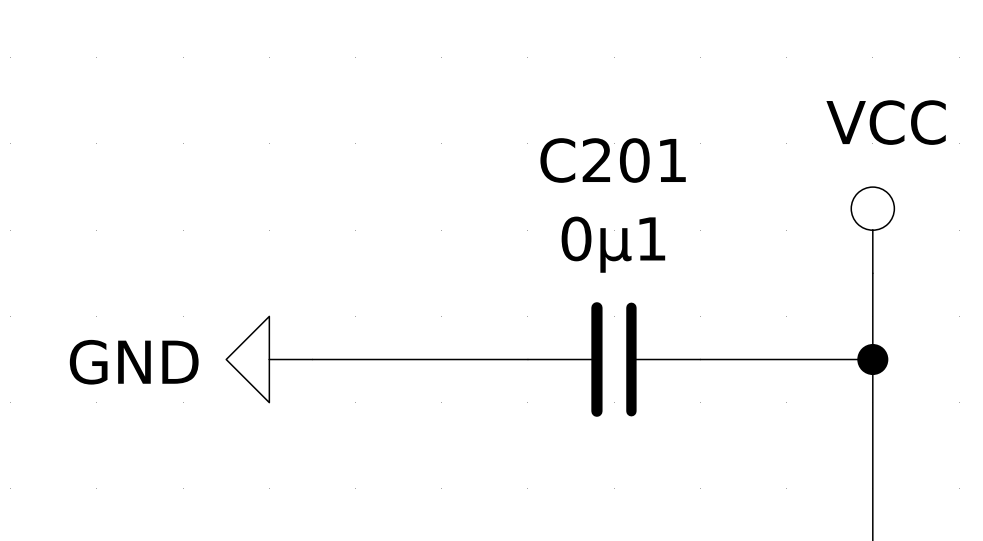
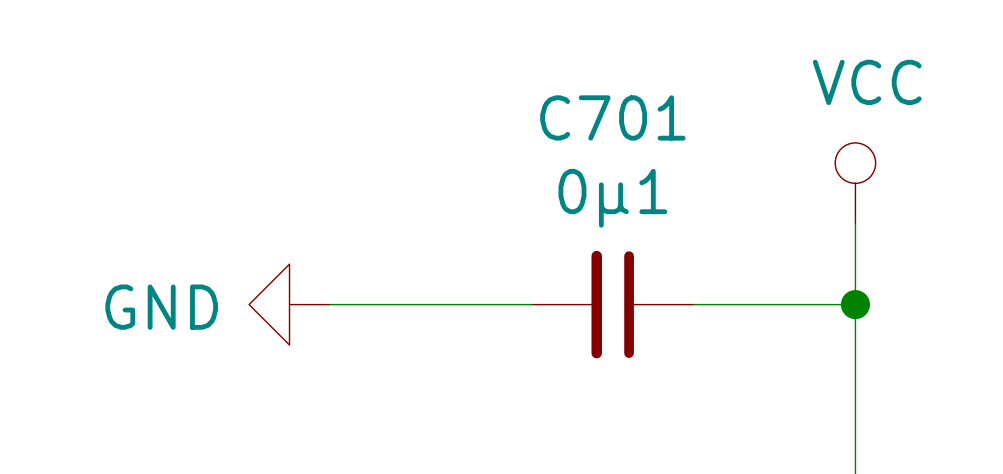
C201 name: C201 (613, 160) -> C701 (612, 117)

